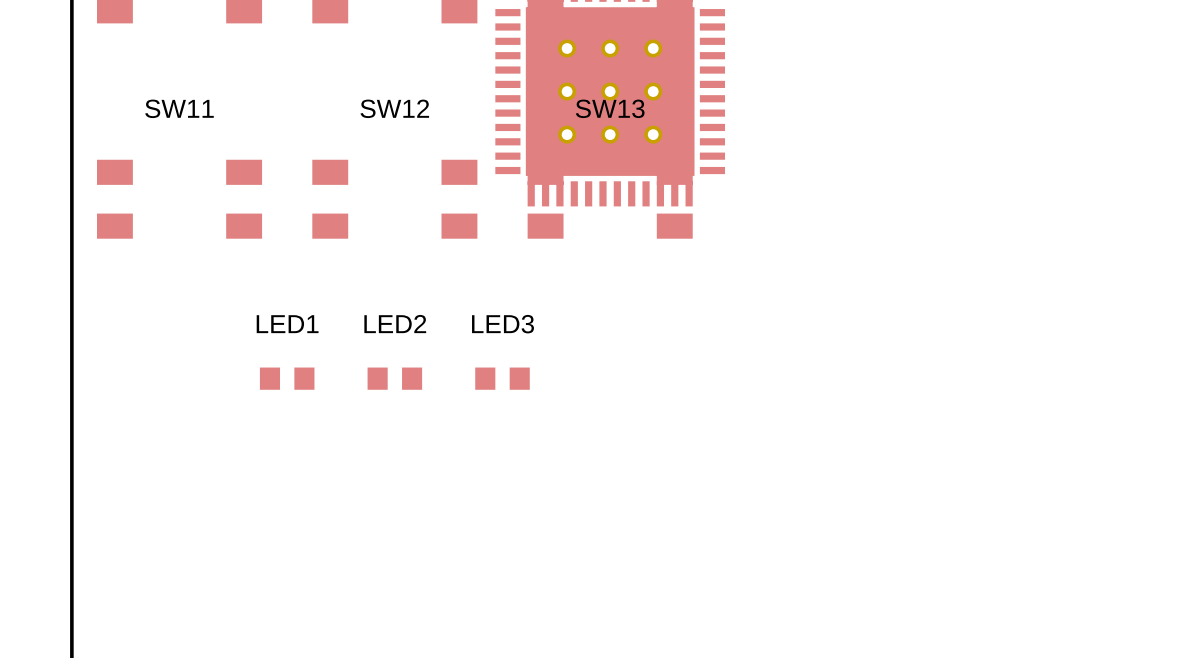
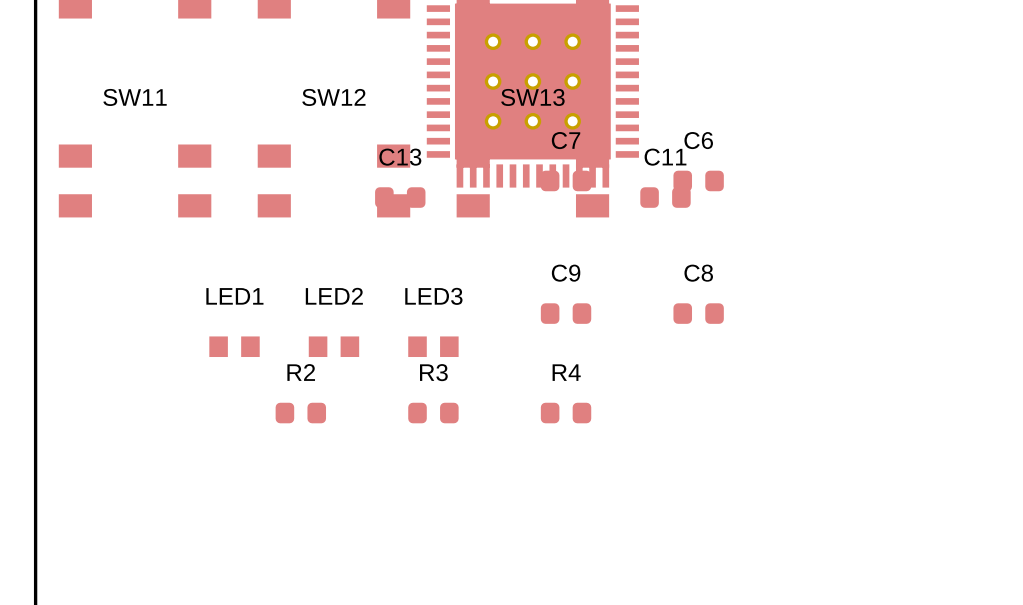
C7: none -> (566, 180)
C6: none -> (698, 180)
C13: none -> (400, 197)
C11: none -> (665, 197)
C9: none -> (566, 313)
C8: none -> (698, 313)
R2: none -> (300, 413)
R3: none -> (433, 413)
R4: none -> (566, 413)

